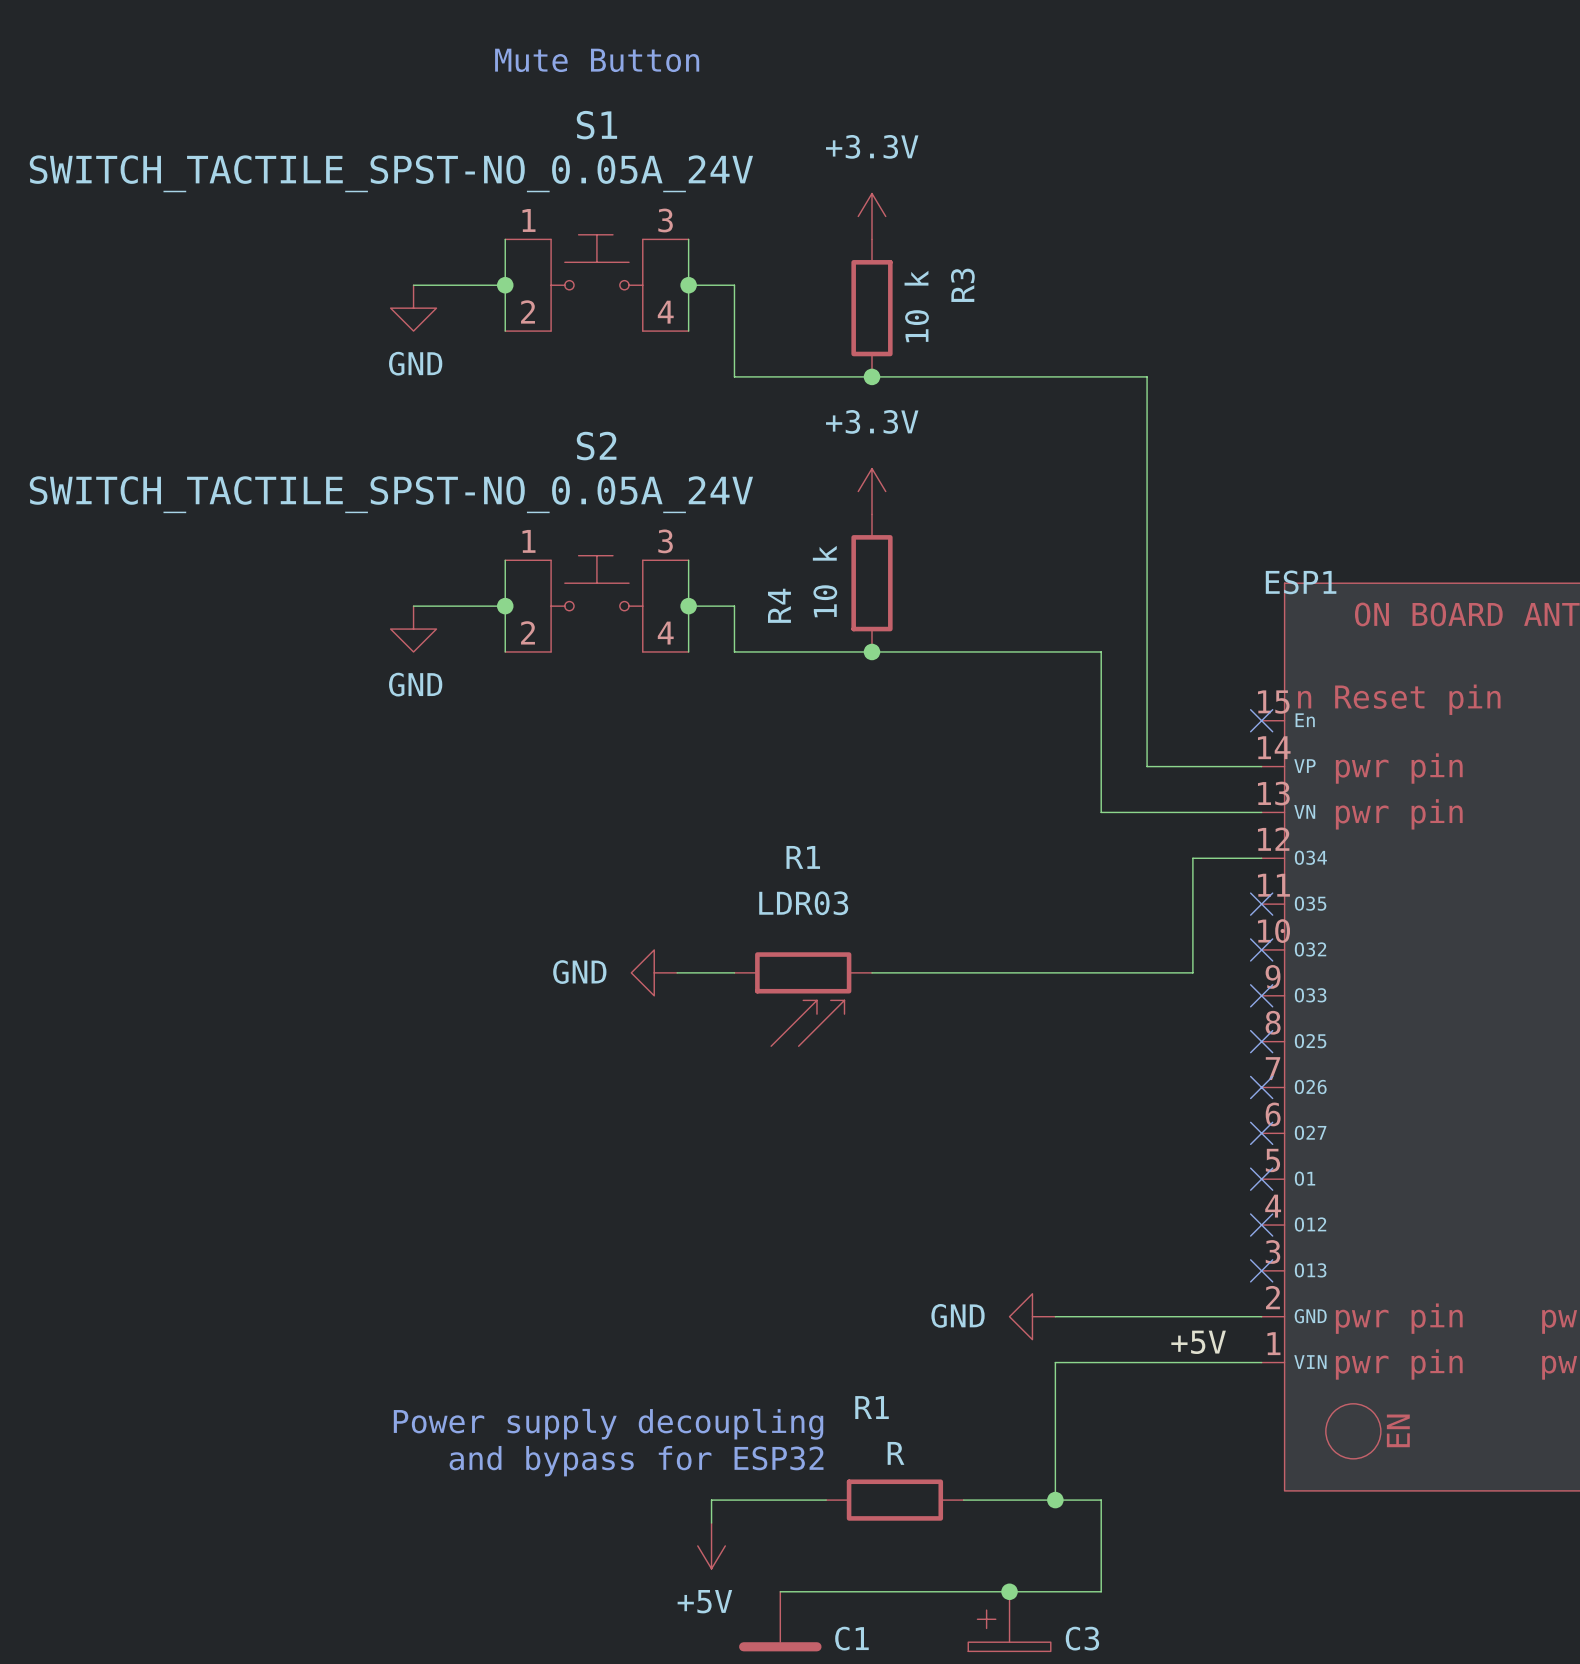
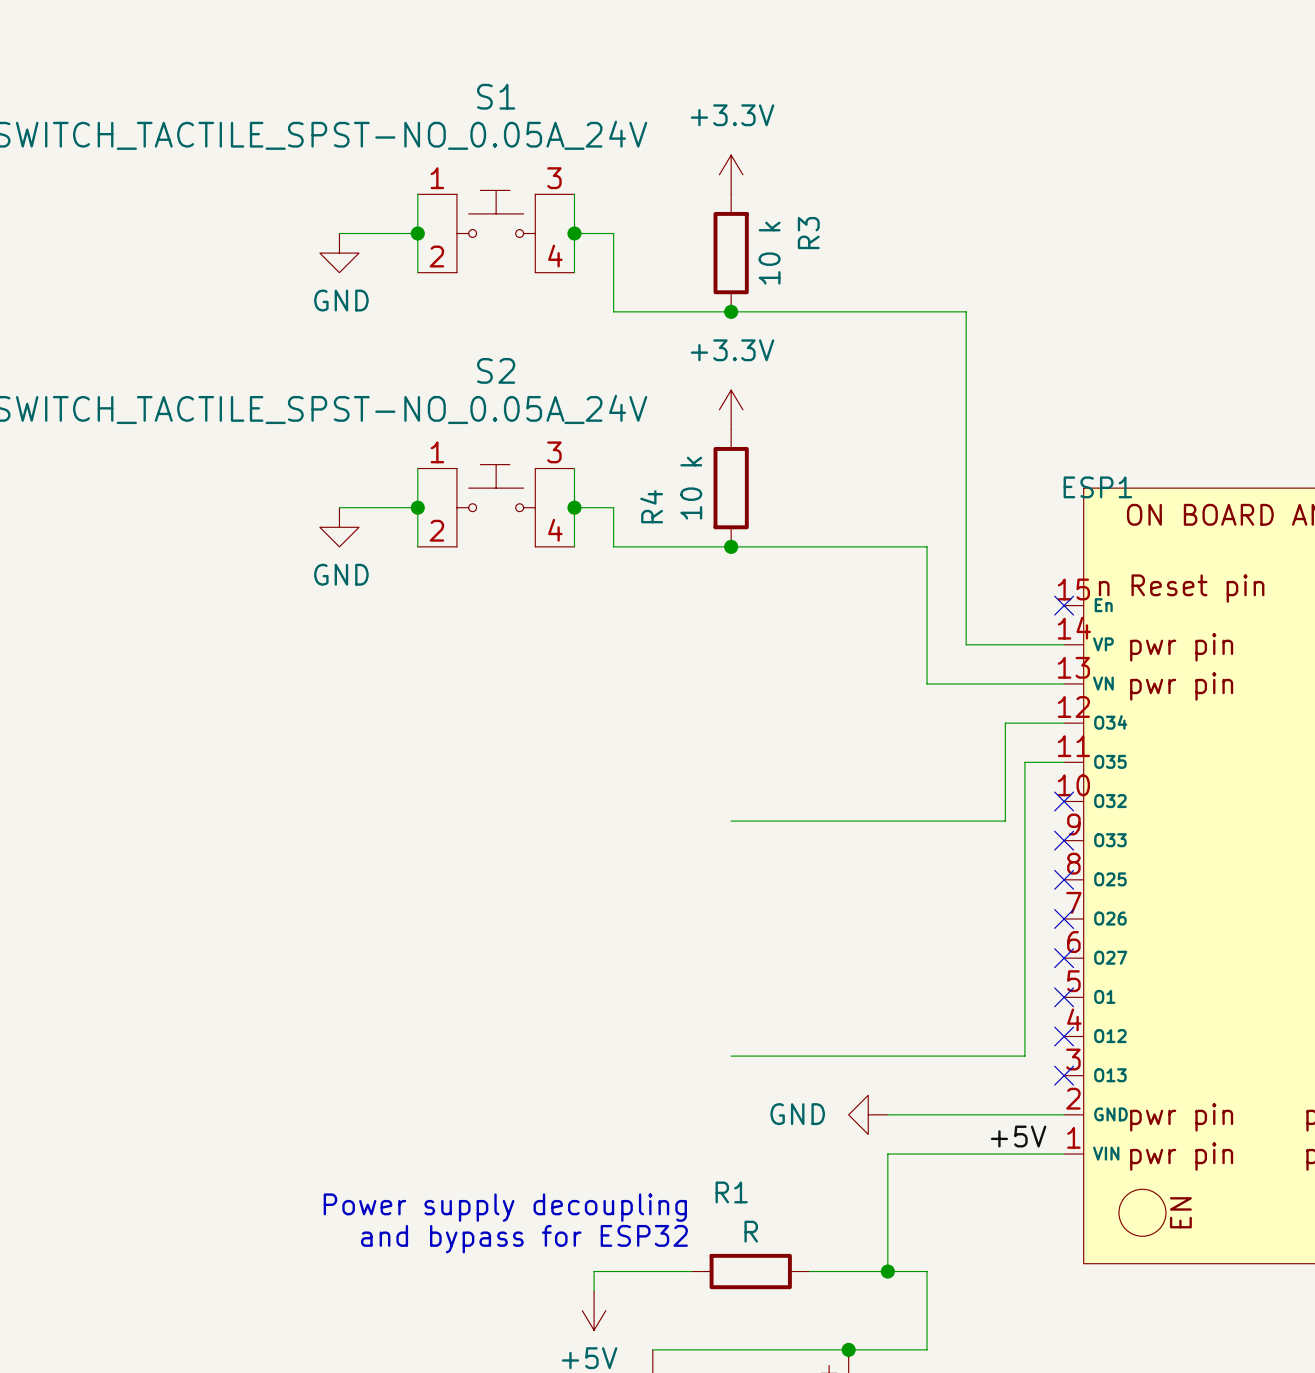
text: Mute Button (597, 60) -> none
wire: none -> (1064, 762) (1024, 762) (1024, 1056) (731, 1056)
no-connect mark: (1261, 904) -> none
power symbol: GND (654, 972) -> none
wire: (677, 972) (734, 972) -> none
R1: LDR03 (803, 999) -> none

